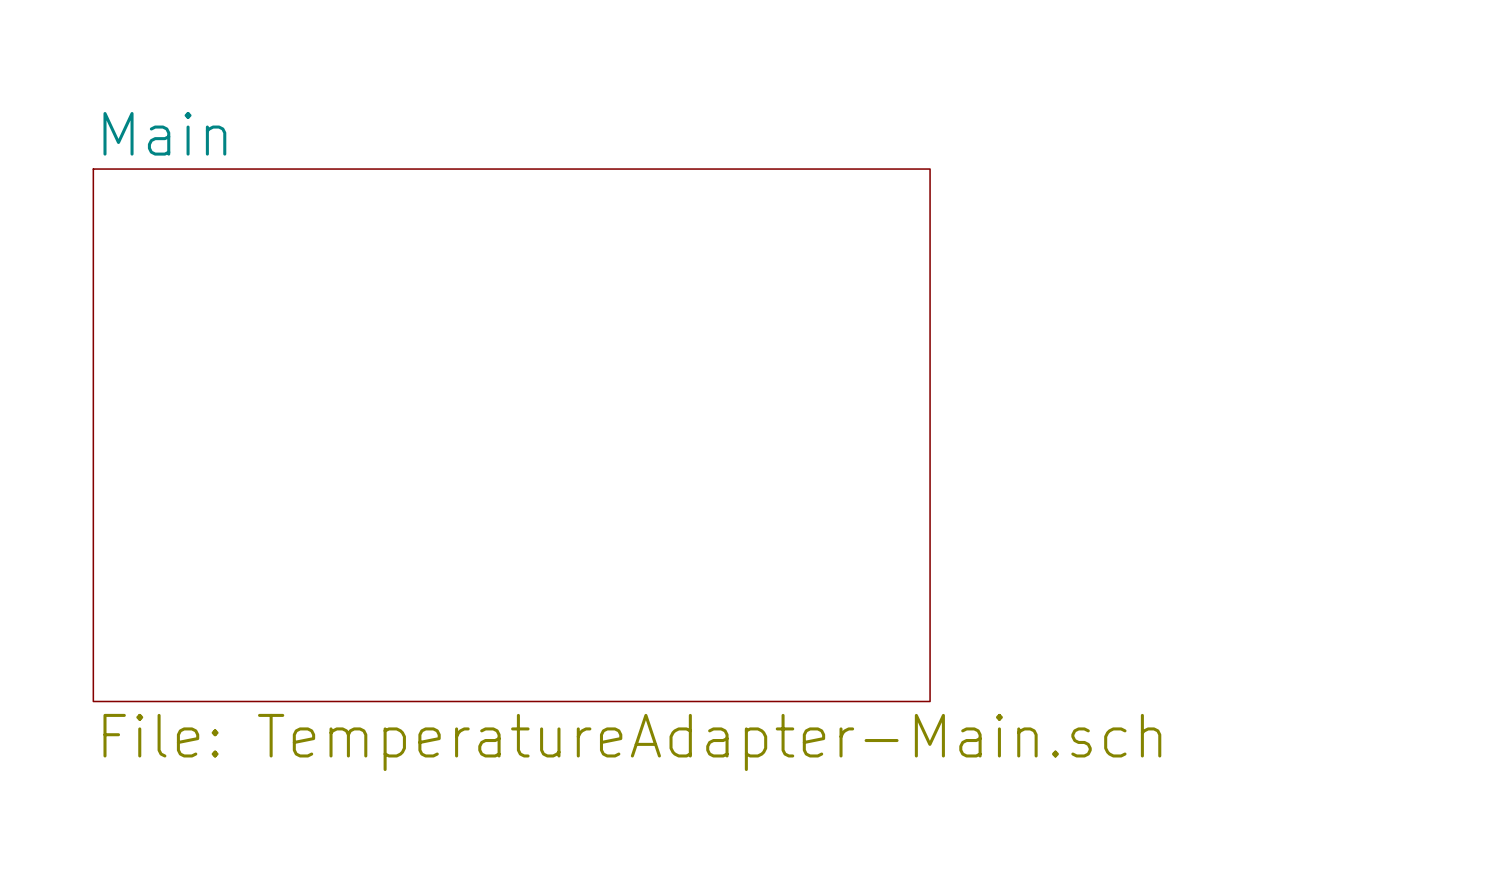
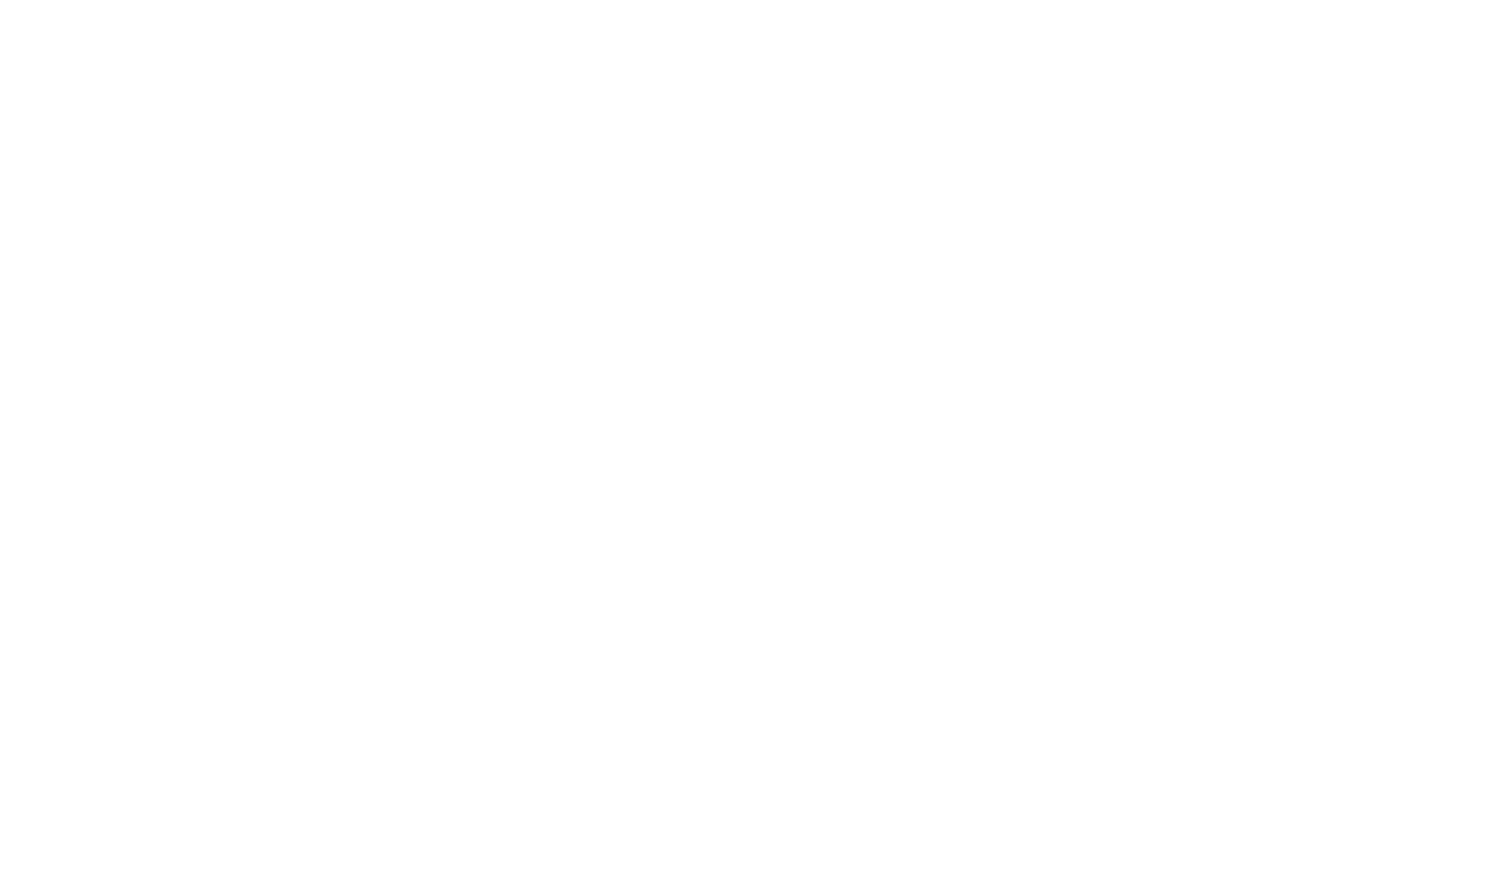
sheet Main: File: TemperatureAdapter-Main.sch (511, 435) -> none

